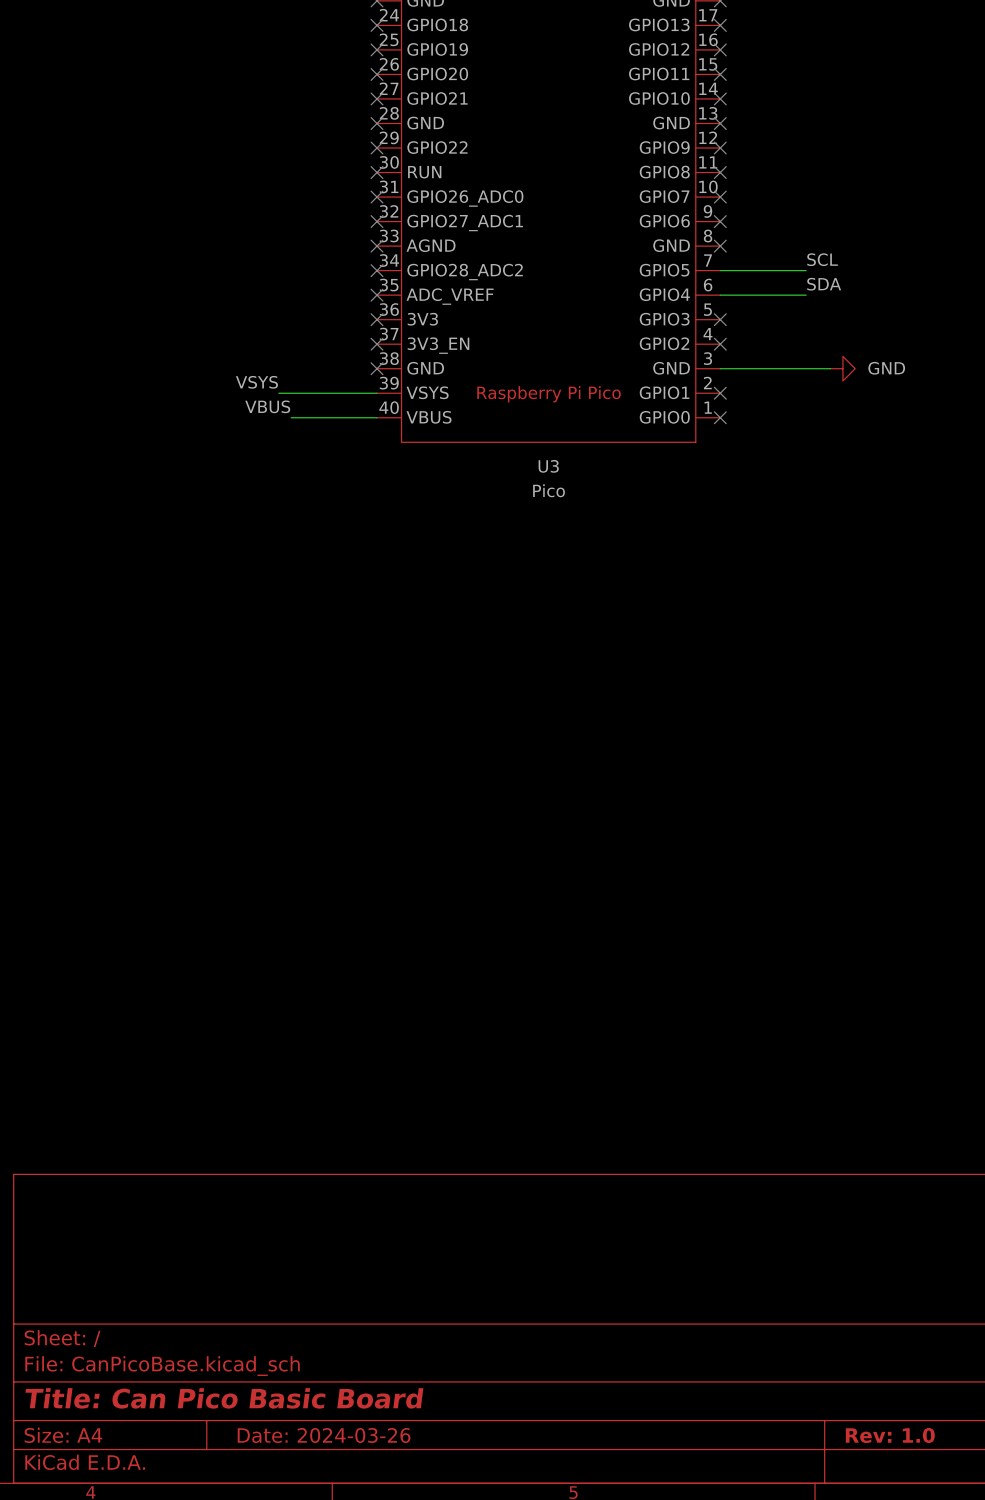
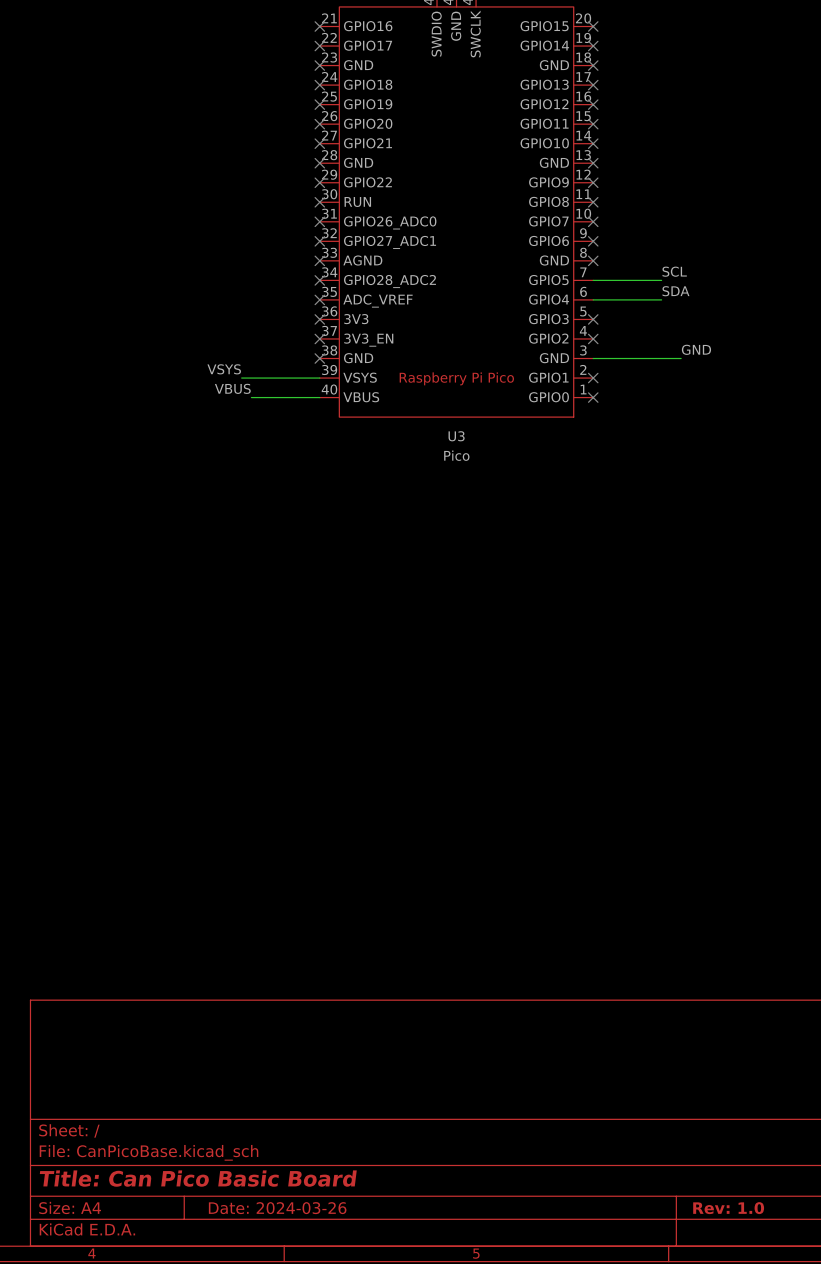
label: none -> GND (696, 349)
power symbol: GND (842, 368) -> none

